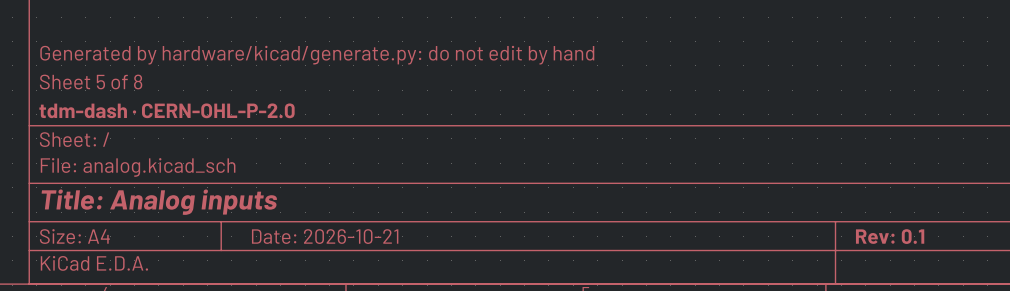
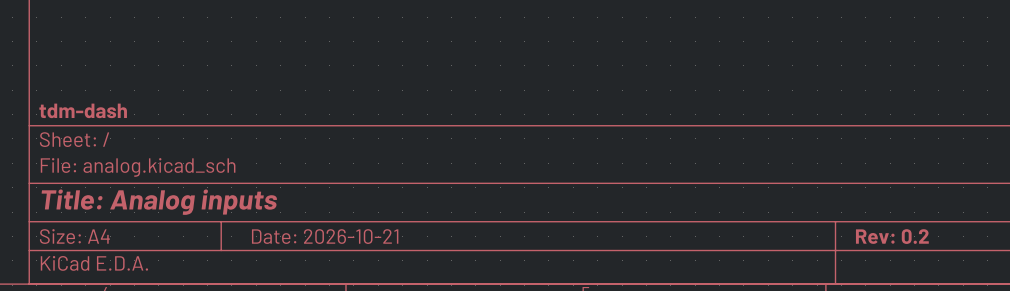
title block: Generated by hardware/kicad/generate.py: do not edit by hand (317, 55) -> none
title block: Sheet 5 of 8 (91, 81) -> none
title block: tdm-dash · CERN-OHL-P-2.0 (166, 110) -> tdm-dash (83, 110)
title block: Rev: 0.1 (890, 236) -> Rev: 0.2 (892, 236)

